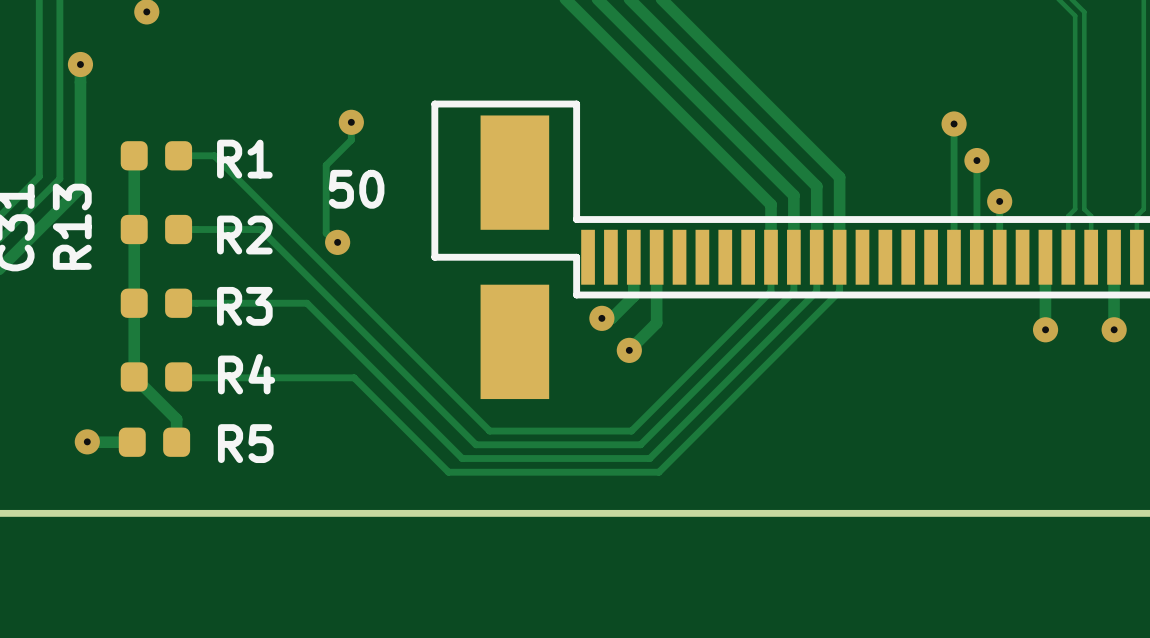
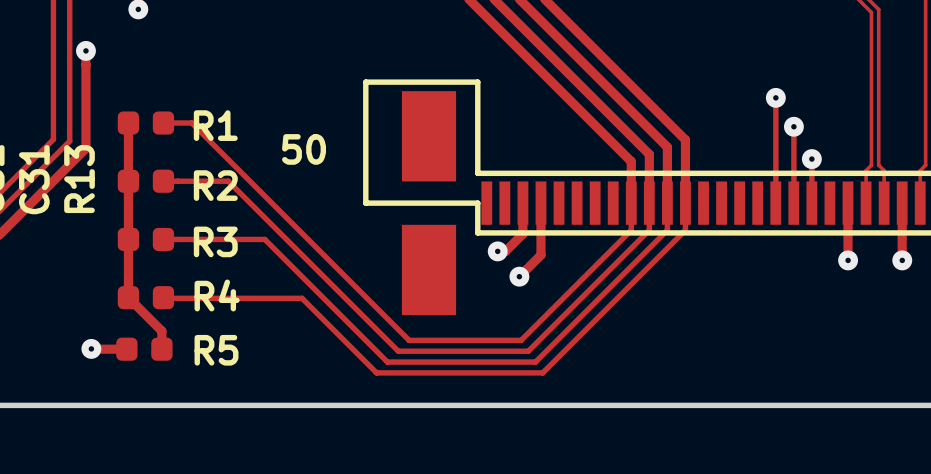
track: (351, 122) (351, 140) (326, 165) (326, 233) (328, 235) -> none
via: (351, 122) -> none
via: (337, 242) -> none

